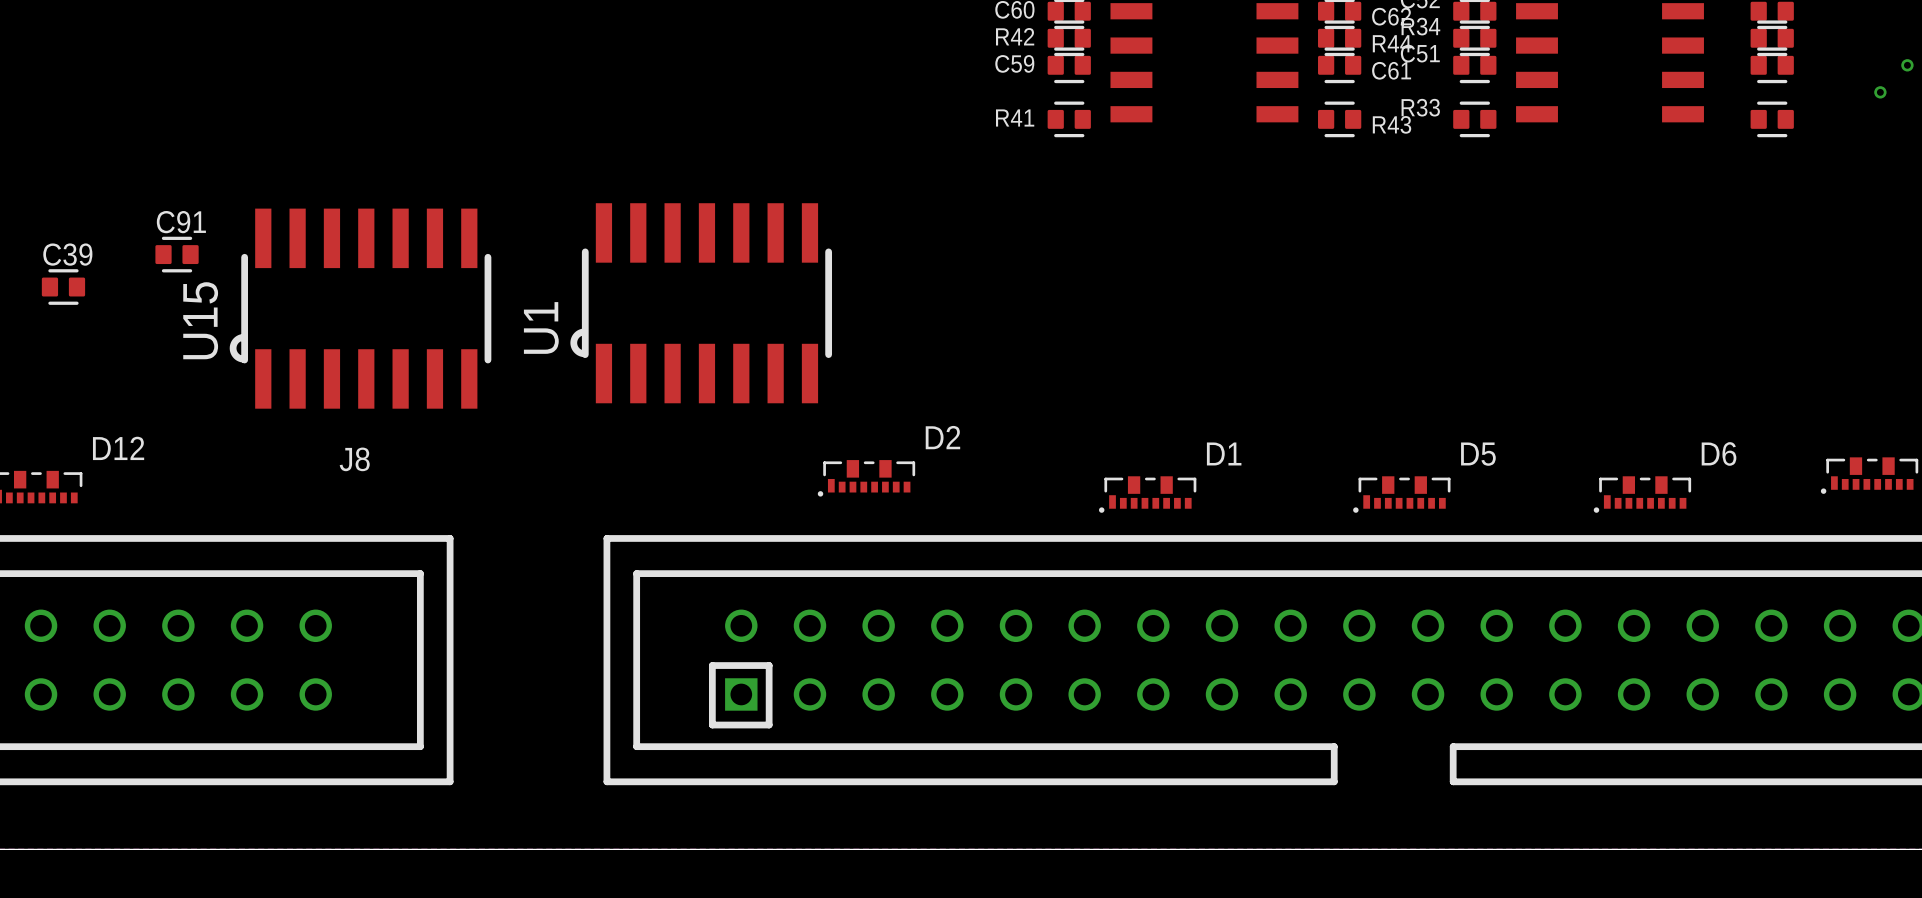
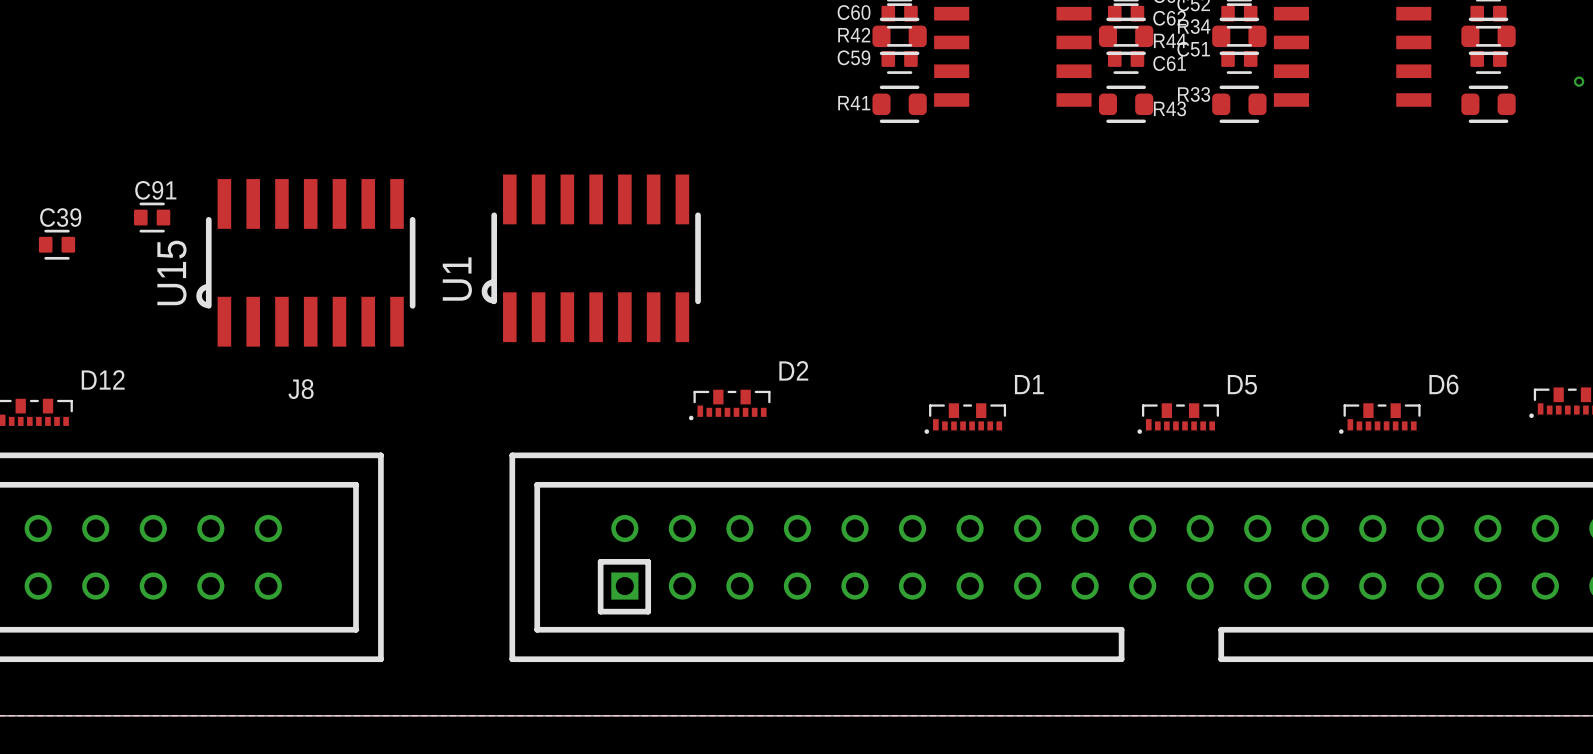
R42 footprint: [1047, 20, 1091, 57] -> [872, 17, 927, 56]
R44 footprint: [1318, 20, 1362, 57] -> [1098, 17, 1154, 56]
R34 footprint: [1453, 20, 1497, 57] -> [1212, 17, 1267, 56]
part footprint: [1750, 20, 1794, 57] -> [1461, 17, 1516, 56]
R41 footprint: [1047, 101, 1091, 138] -> [872, 85, 927, 123]
R43 footprint: [1318, 101, 1362, 138] -> [1098, 85, 1154, 123]
R33 footprint: [1453, 101, 1497, 138] -> [1212, 85, 1267, 123]
part footprint: [1750, 101, 1794, 138] -> [1461, 85, 1516, 123]

